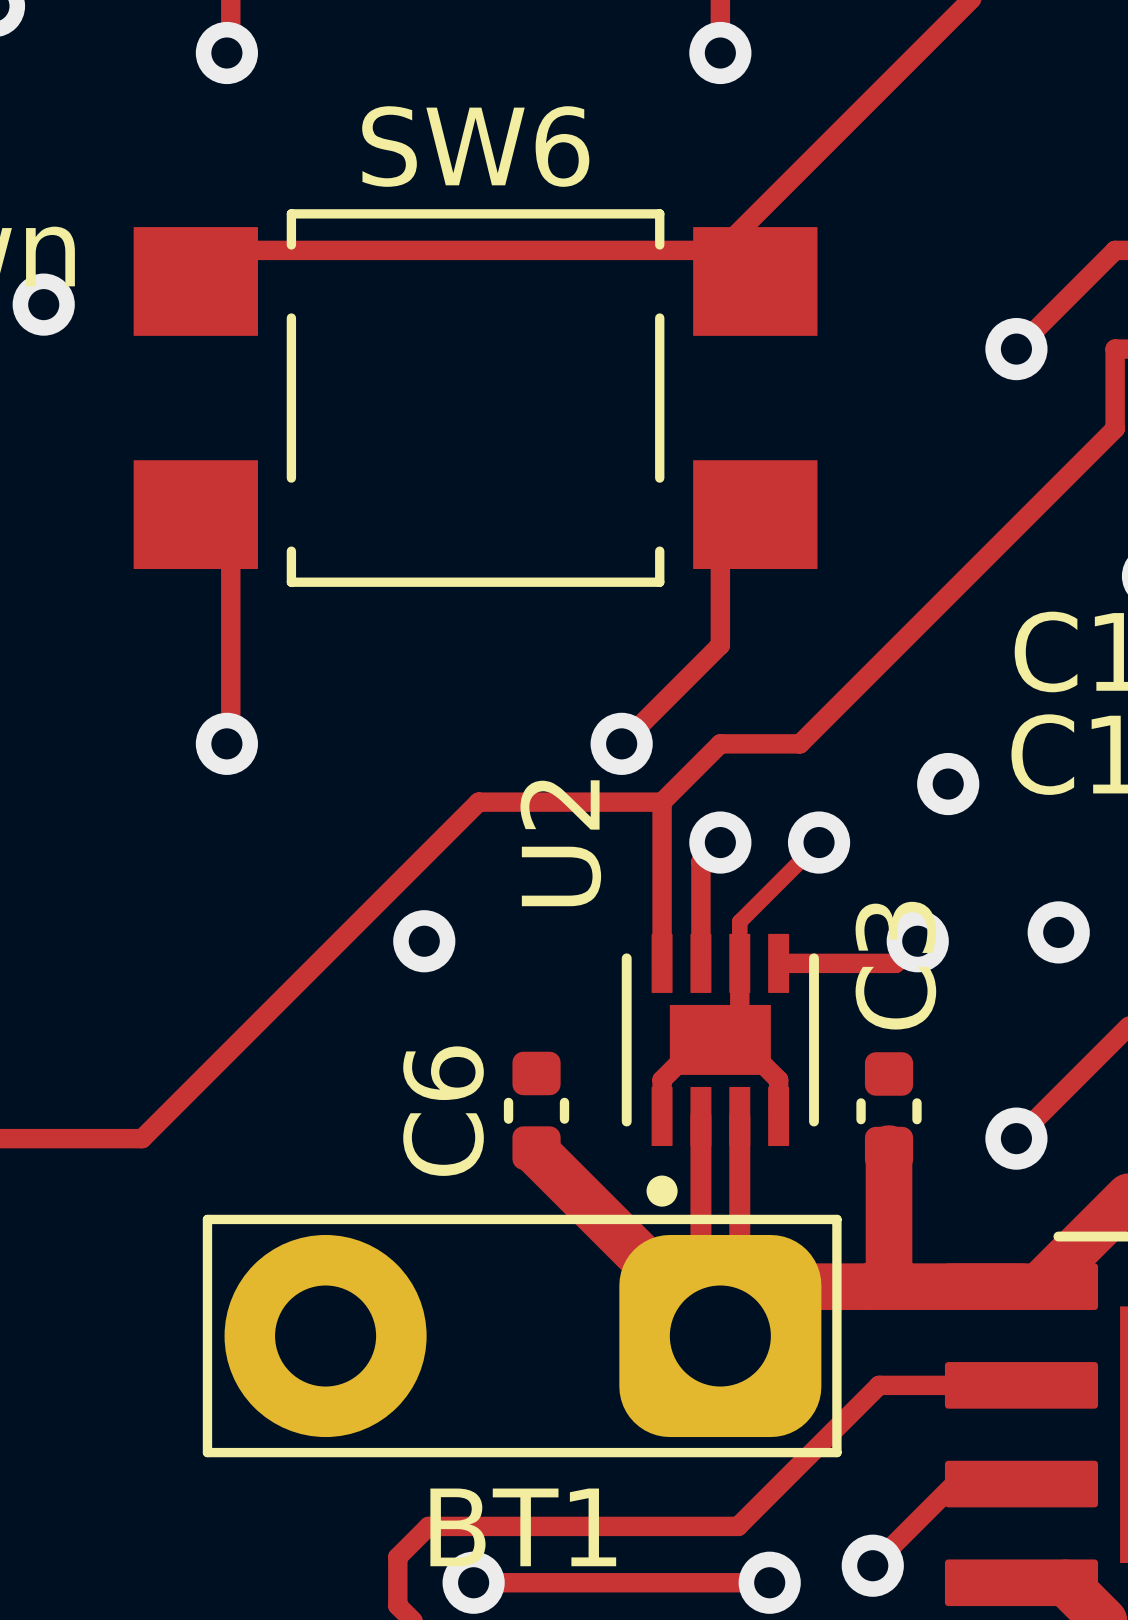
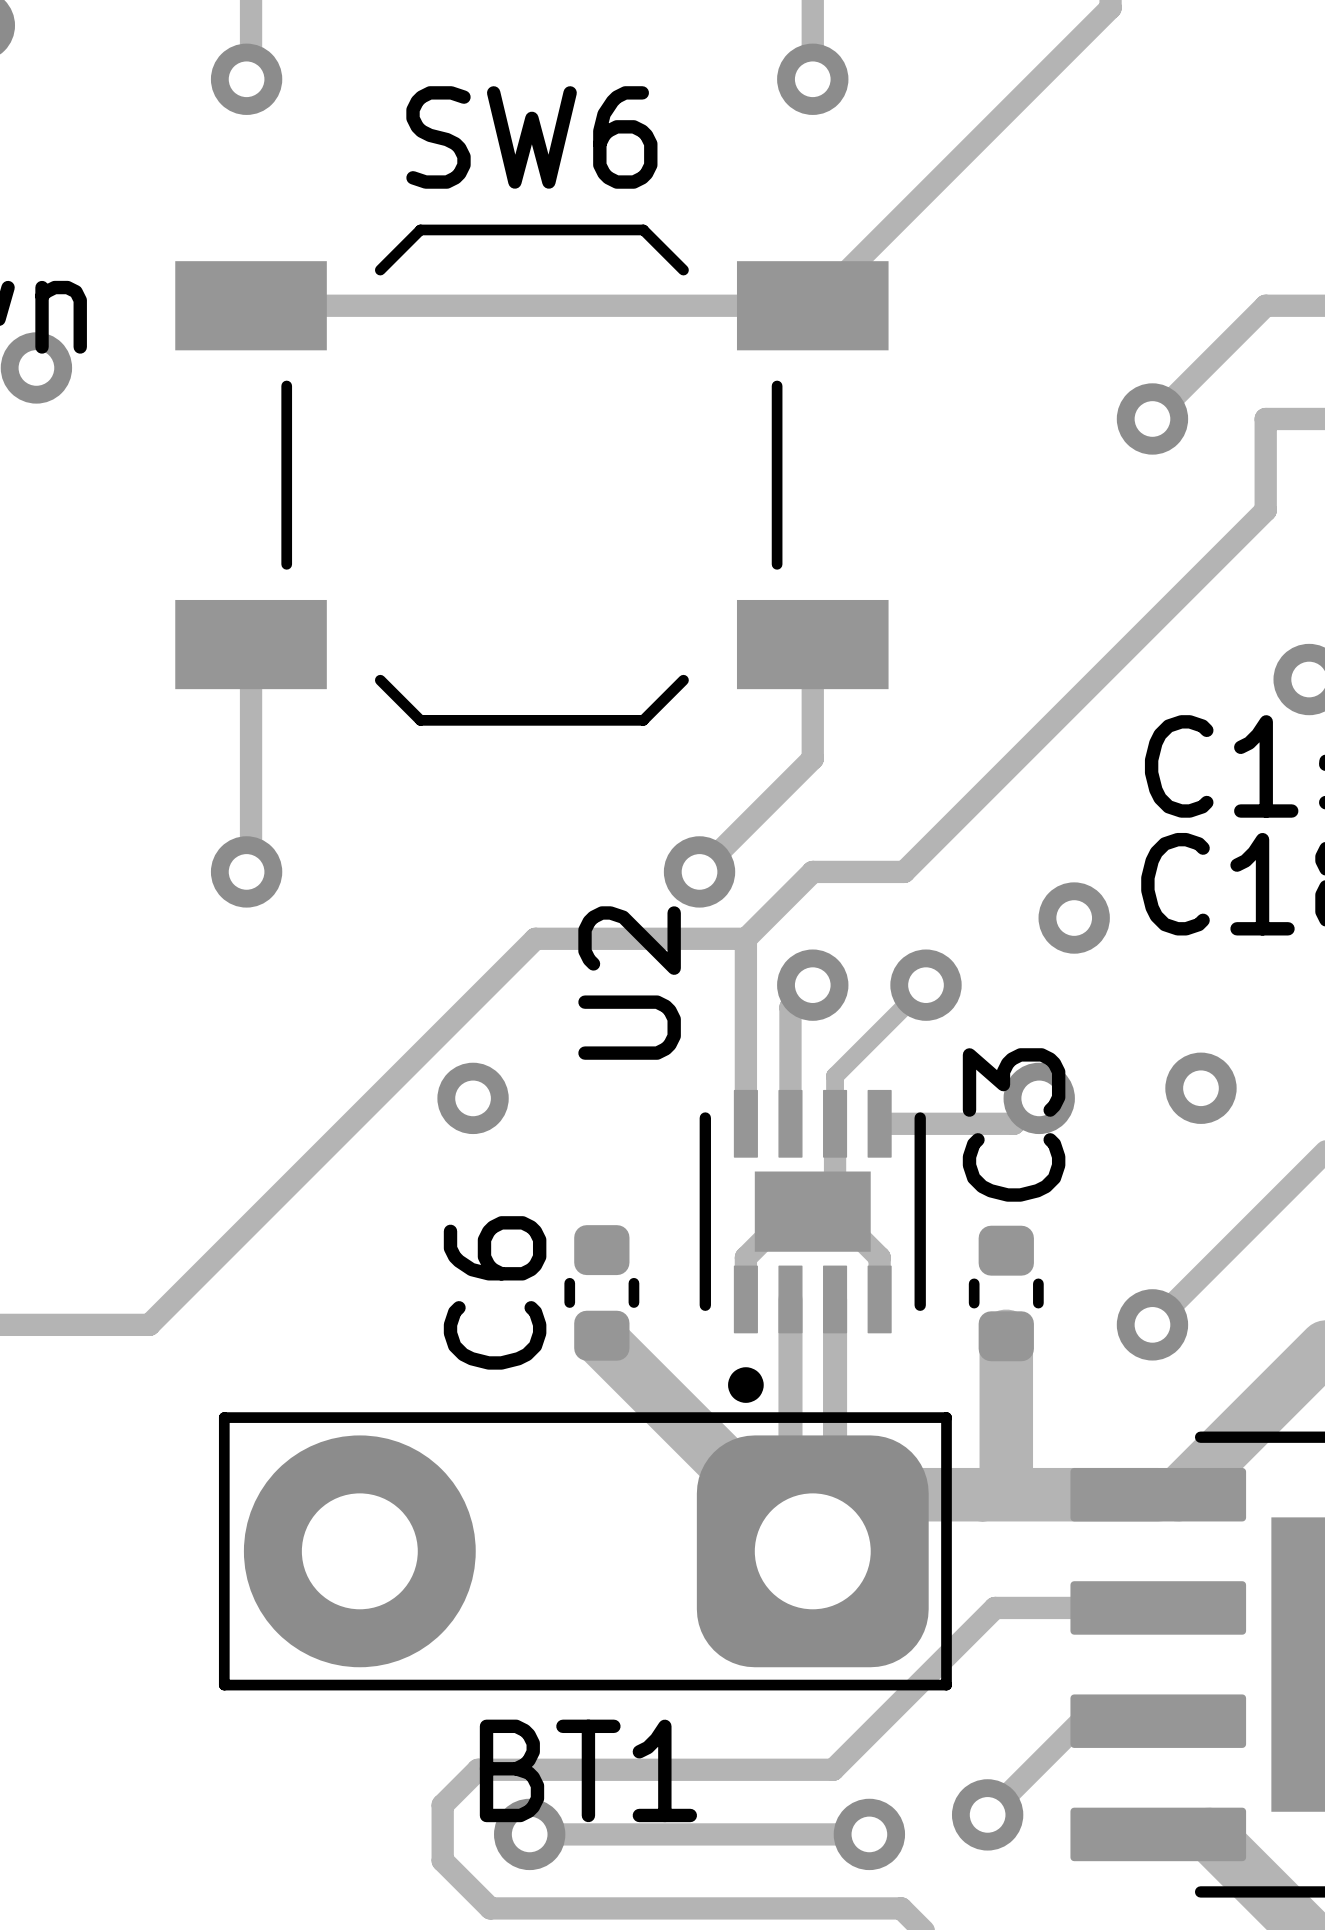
SW6 name position: SW6 (475, 146) -> SW6 (531, 137)
SW6 footprint: [133, 209, 818, 587] -> [175, 224, 889, 726]

